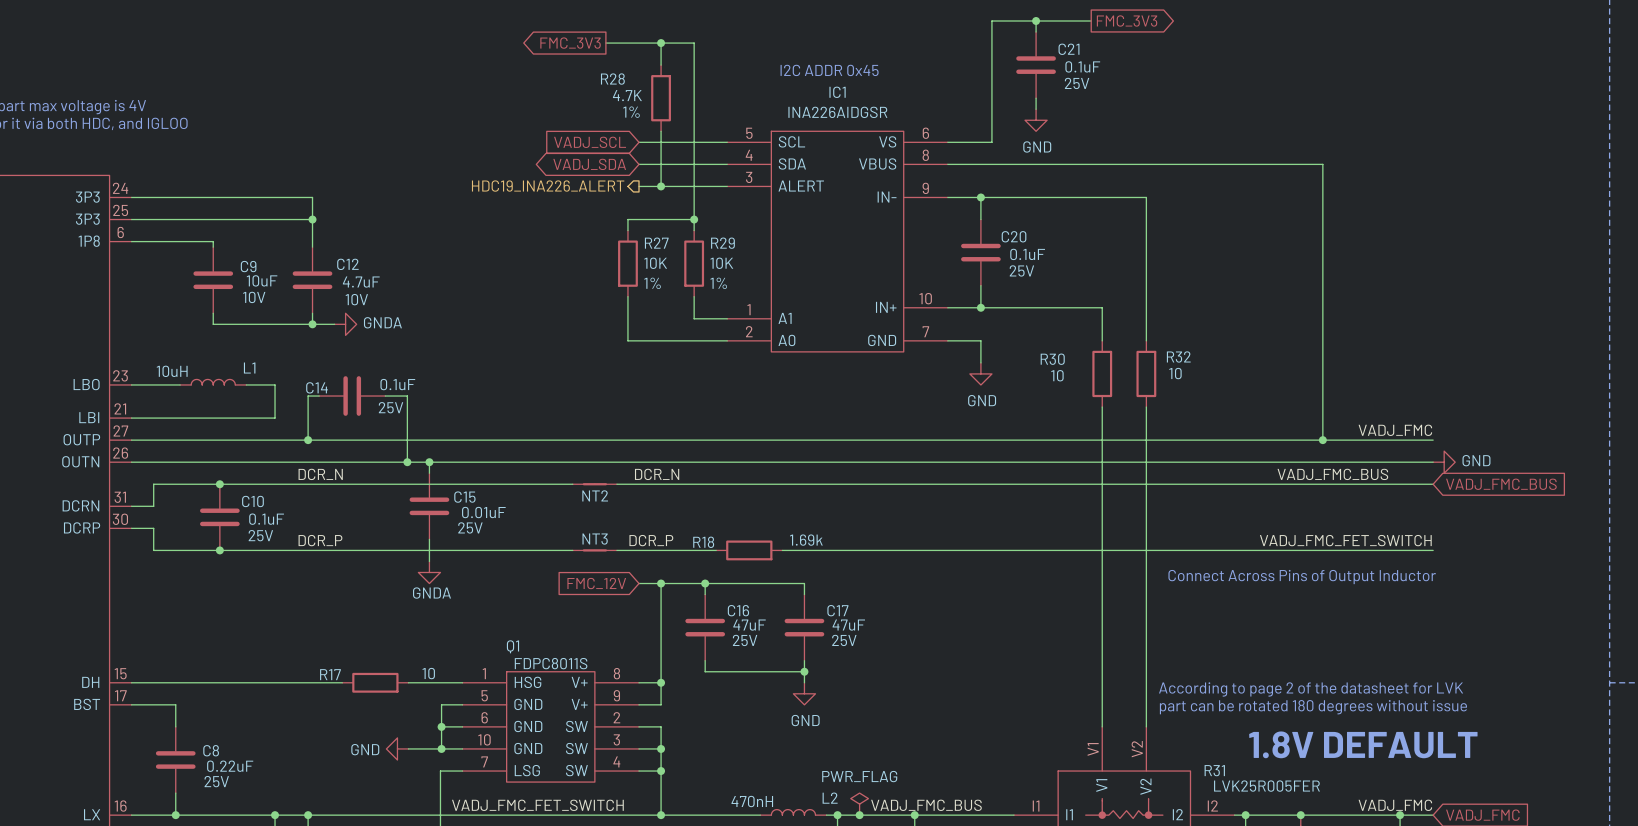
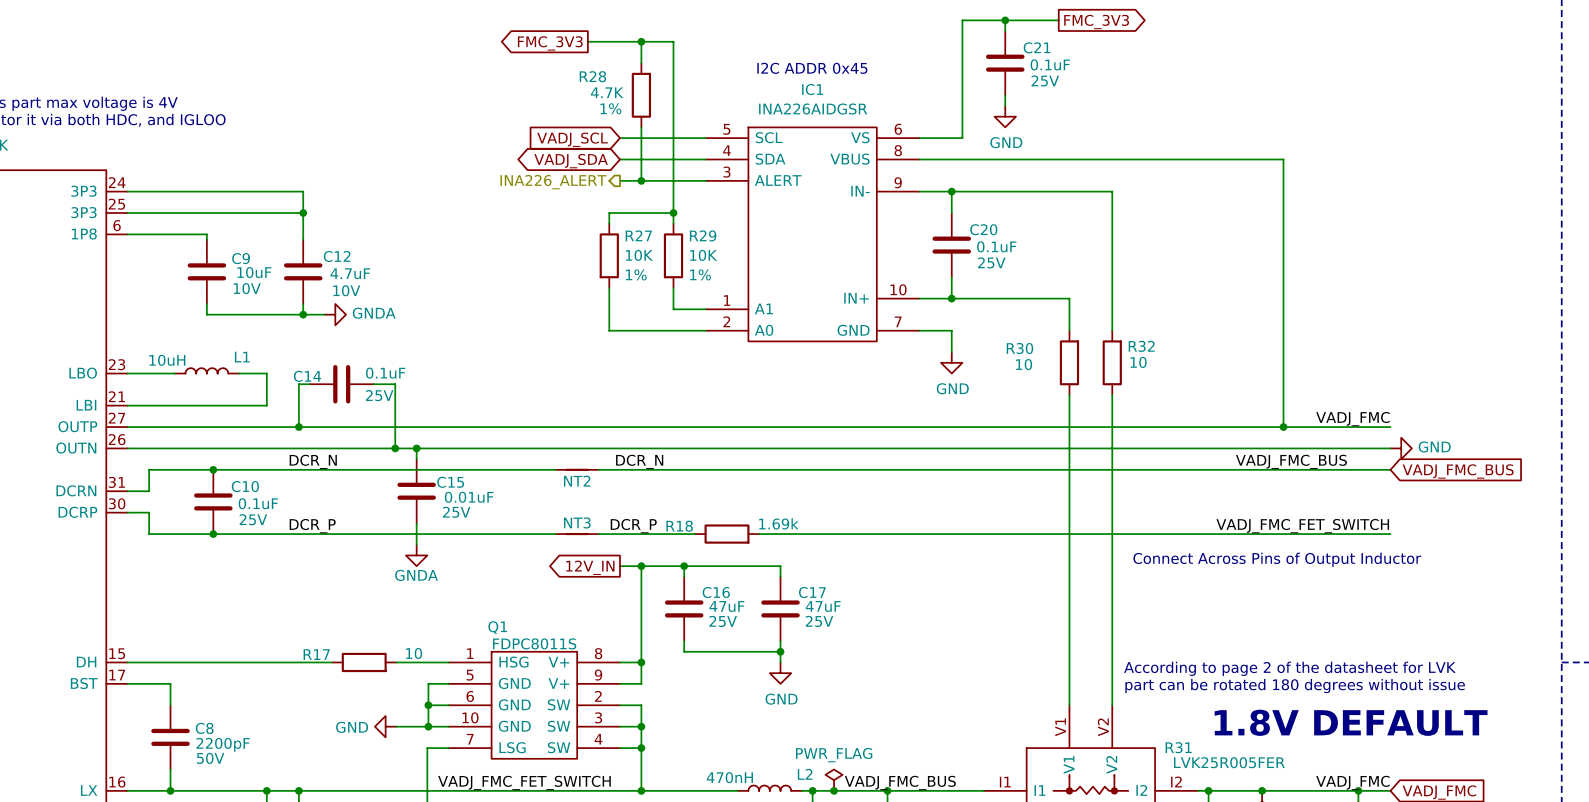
hierarchical label: HDC19_INA226_ALERT (548, 186) -> INA226_ALERT (553, 182)
global label shape: input (596, 583) -> output (590, 567)
global label: FMC_12V (596, 583) -> 12V_IN (590, 567)
C8 value: 0.22uF (230, 766) -> 2200pF (223, 744)
C8 text: 25V (216, 781) -> 50V (210, 758)

